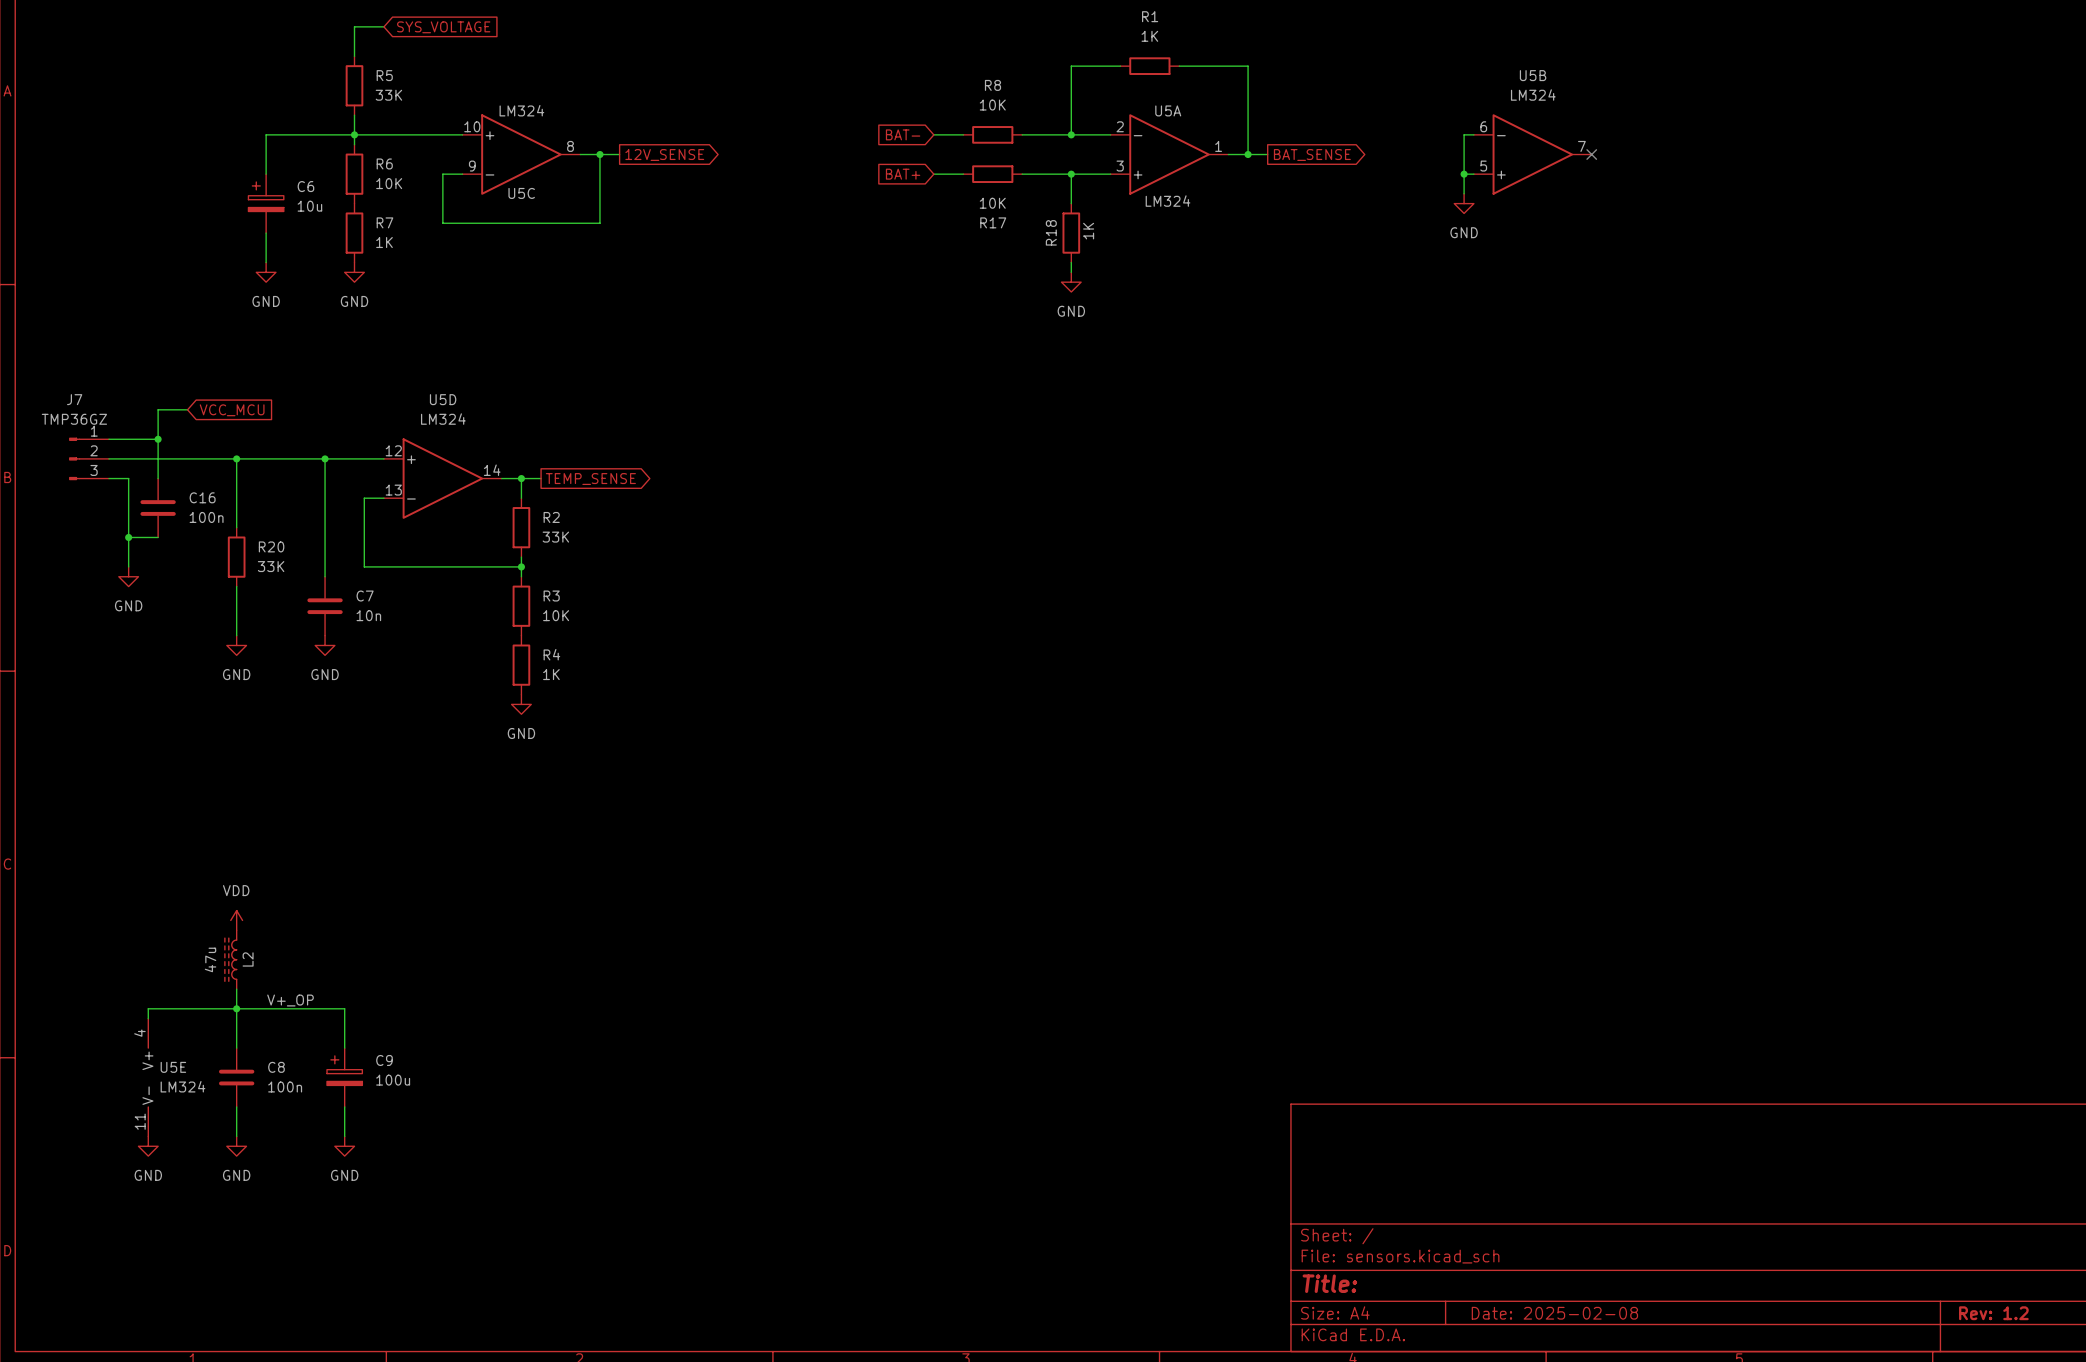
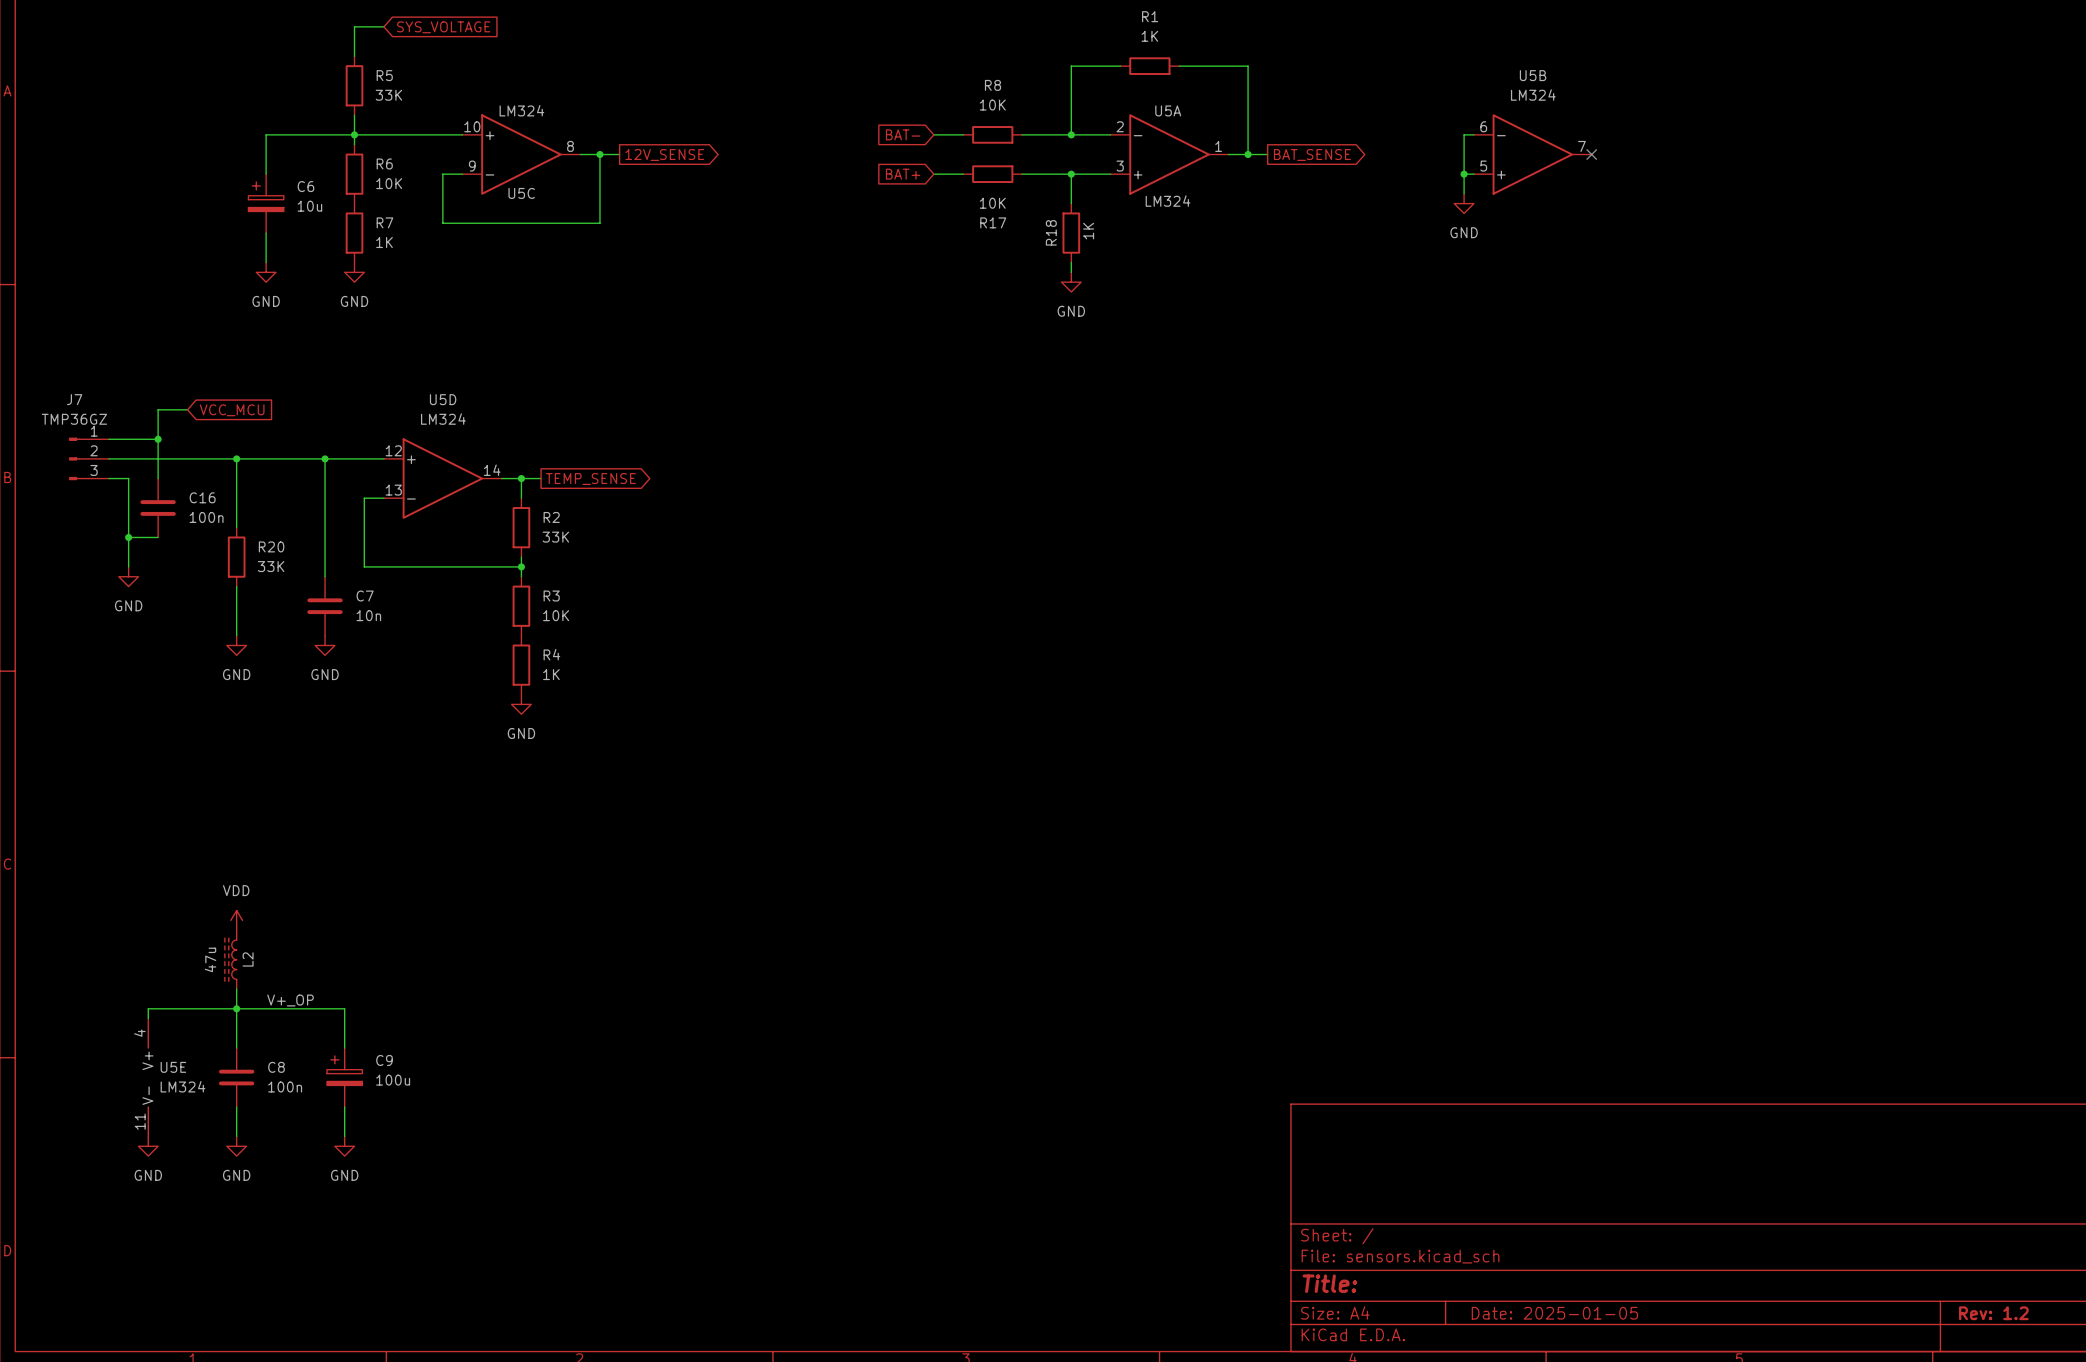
title block: Date: 2025-02-08 (1554, 1313) -> Date: 2025-01-05 (1554, 1313)

